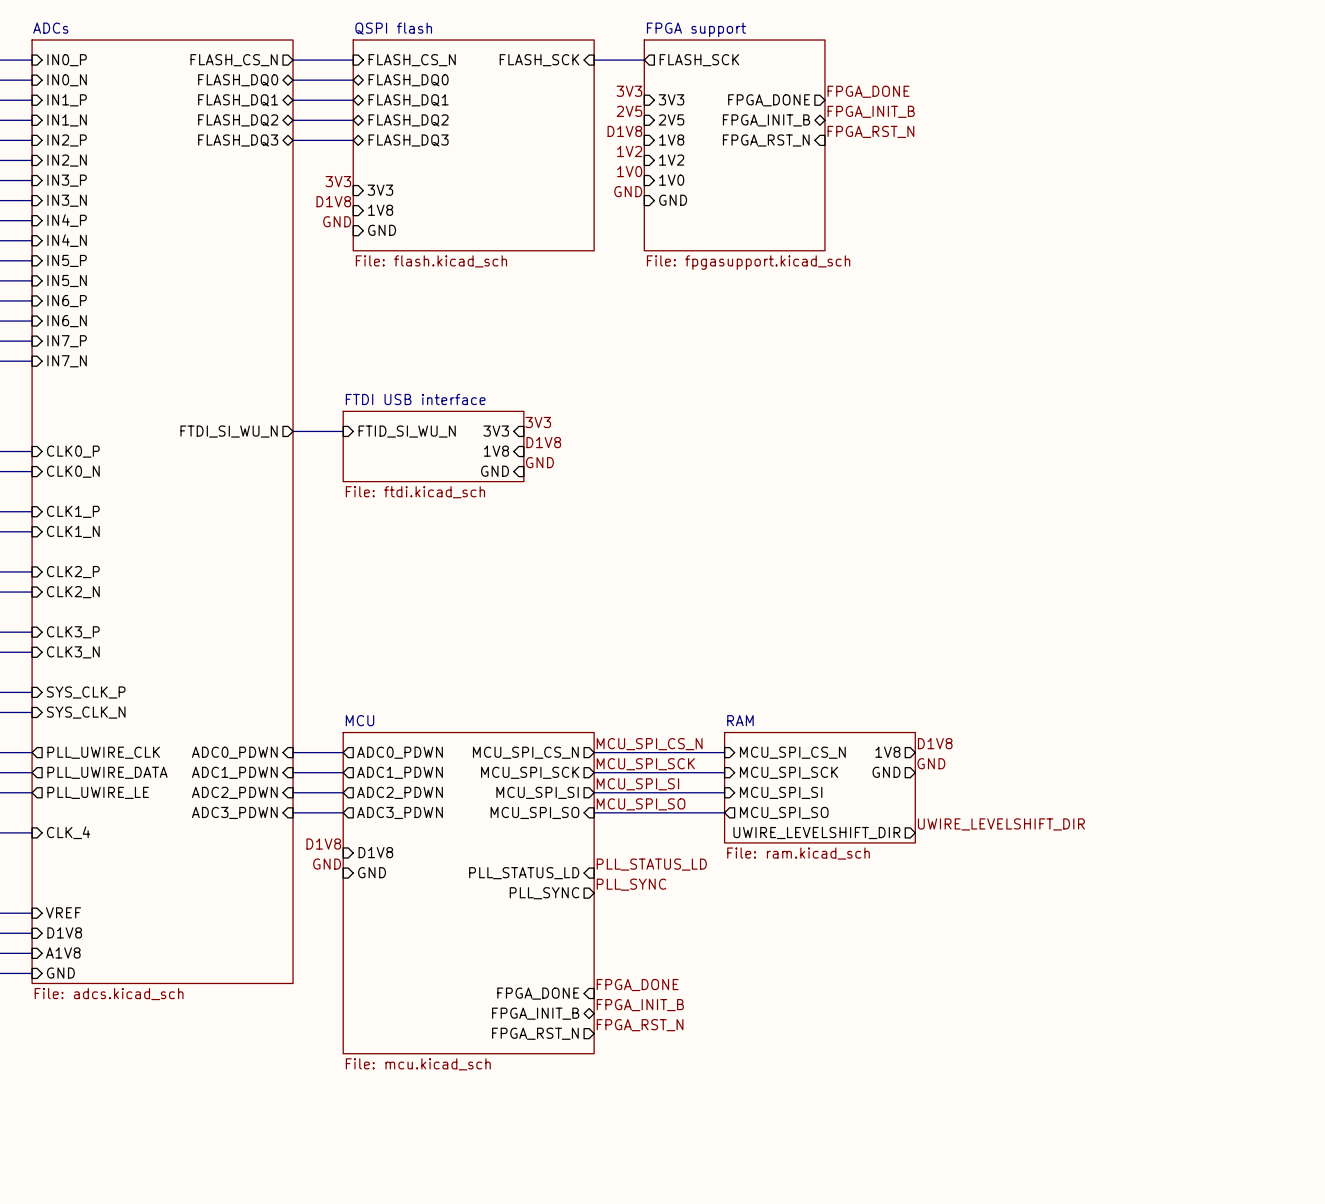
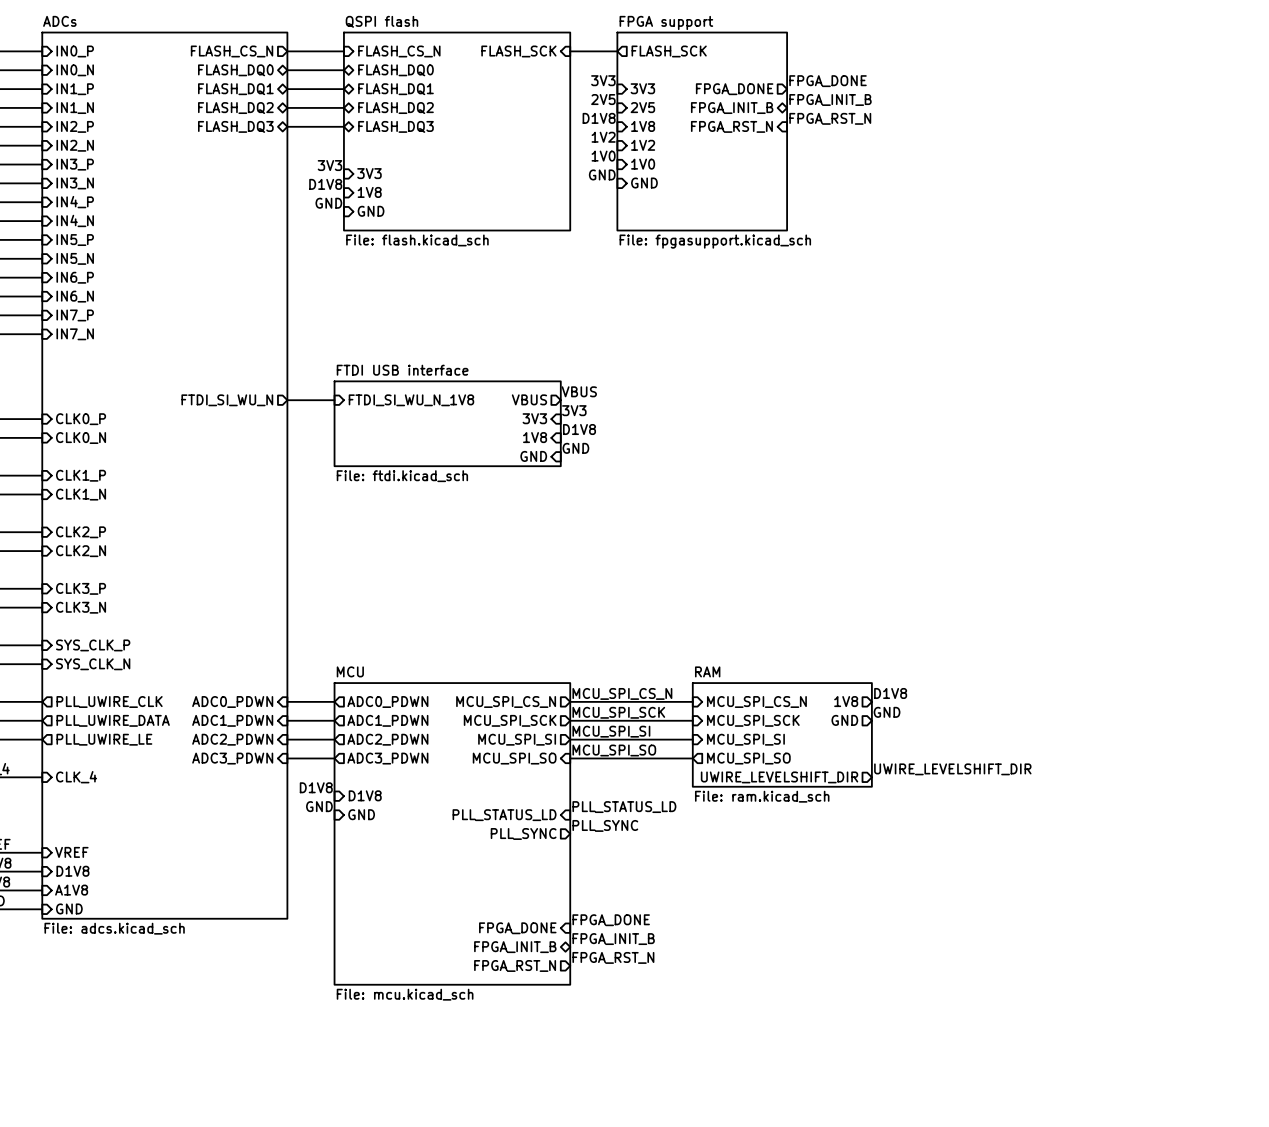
label position: 3V3 (538, 422) -> 3V3 (574, 410)
label: none -> VBUS (579, 391)
sheet pin: FTID_SI_WU_N (407, 431) -> FTDI_SI_WU_N_1V8 (411, 400)
sheet pin position: 3V3 (496, 431) -> 3V3 (534, 418)
sheet pin: none -> VBUS (529, 399)
label position: D1V8 (543, 442) -> D1V8 (579, 429)
sheet FTDI USB interface: File: ftdi.kicad_sch (433, 446) -> none
sheet pin position: 1V8 (496, 451) -> 1V8 (535, 437)
sheet FTDI USB interface: none -> File: ftdi.kicad_sch (447, 423)
label position: GND (539, 462) -> GND (575, 448)
sheet pin position: GND (495, 471) -> GND (533, 456)

